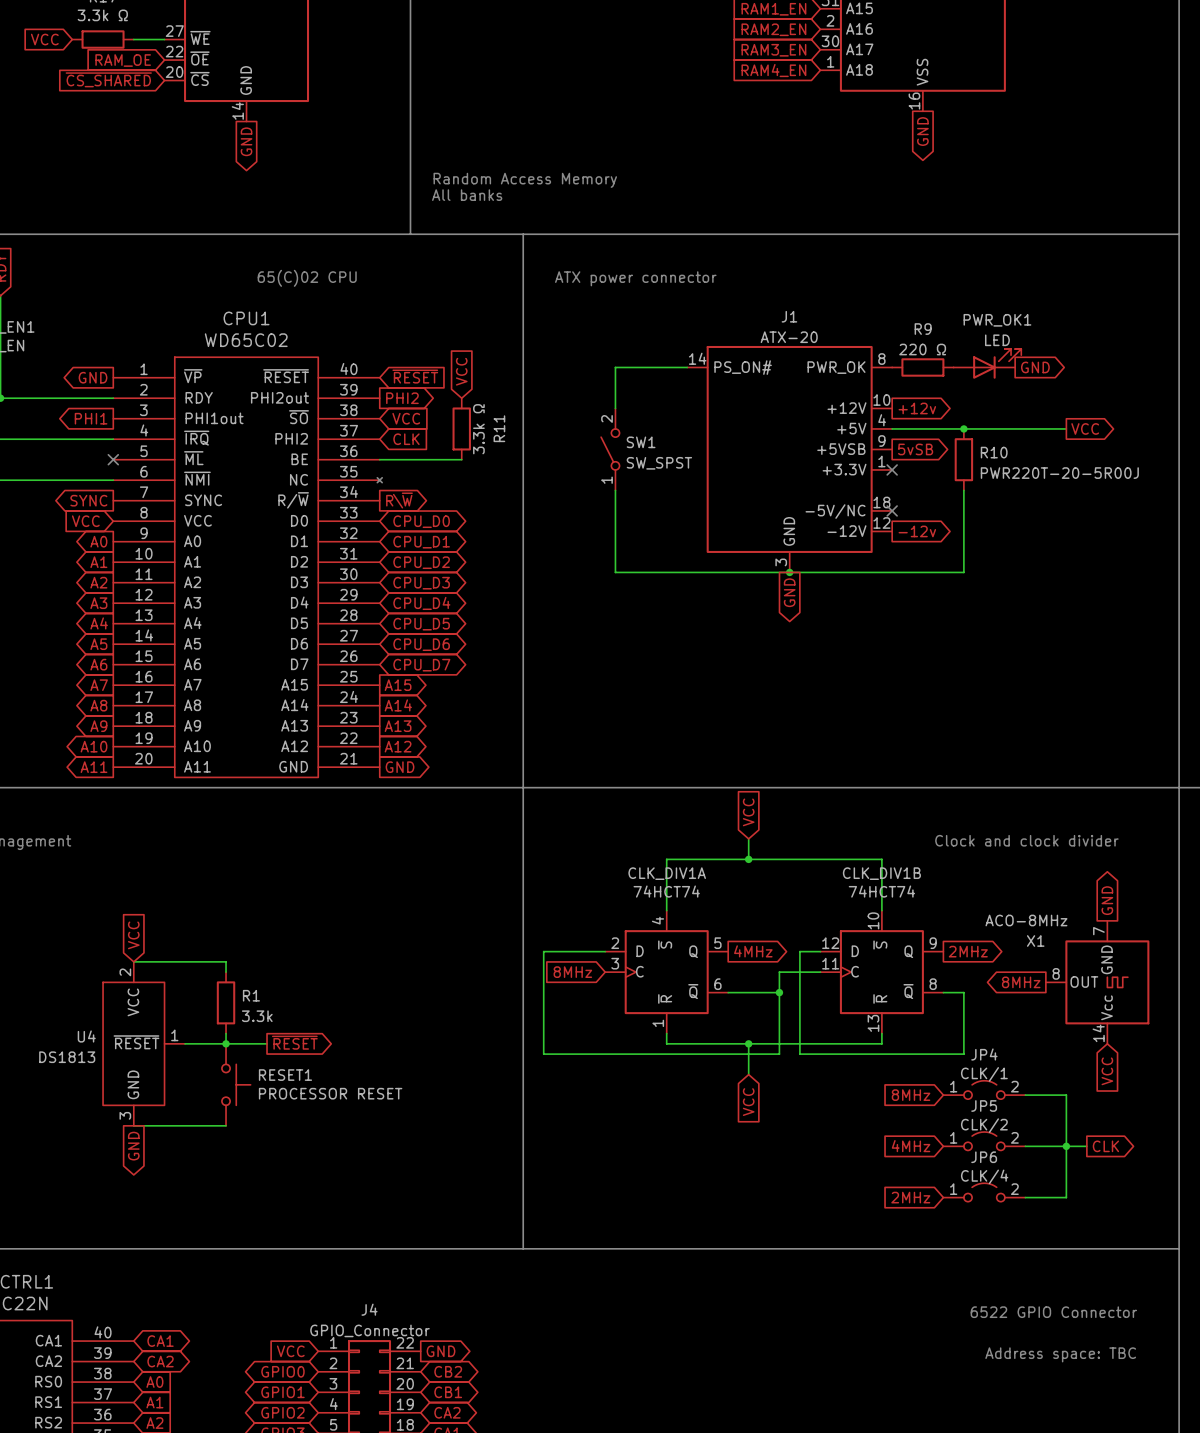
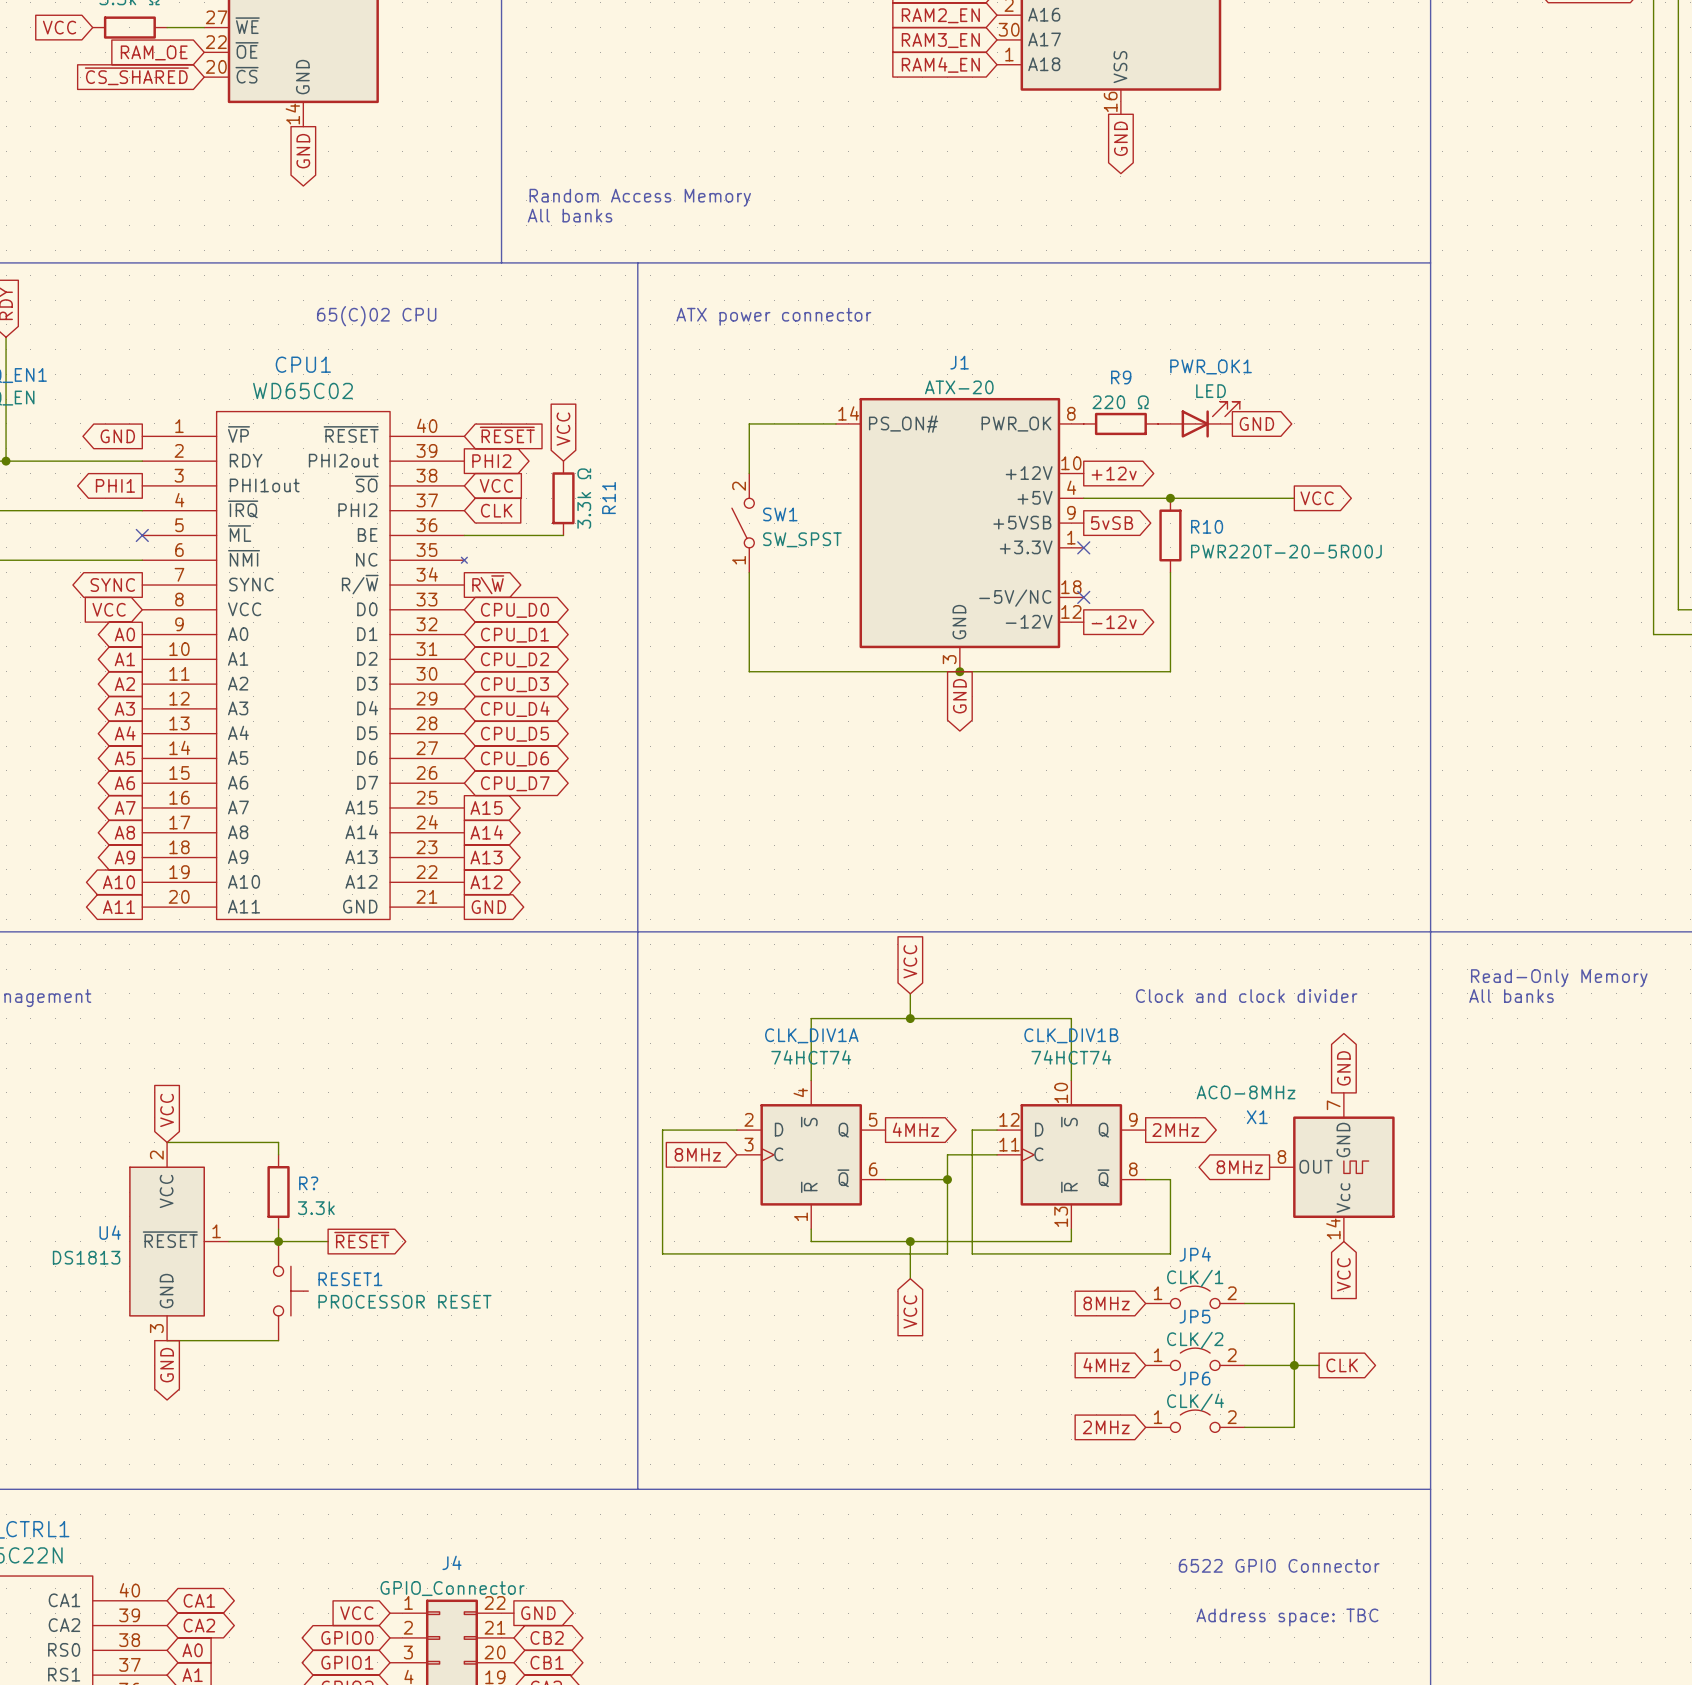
R1 name: R1 (251, 995) -> R? (308, 1183)

